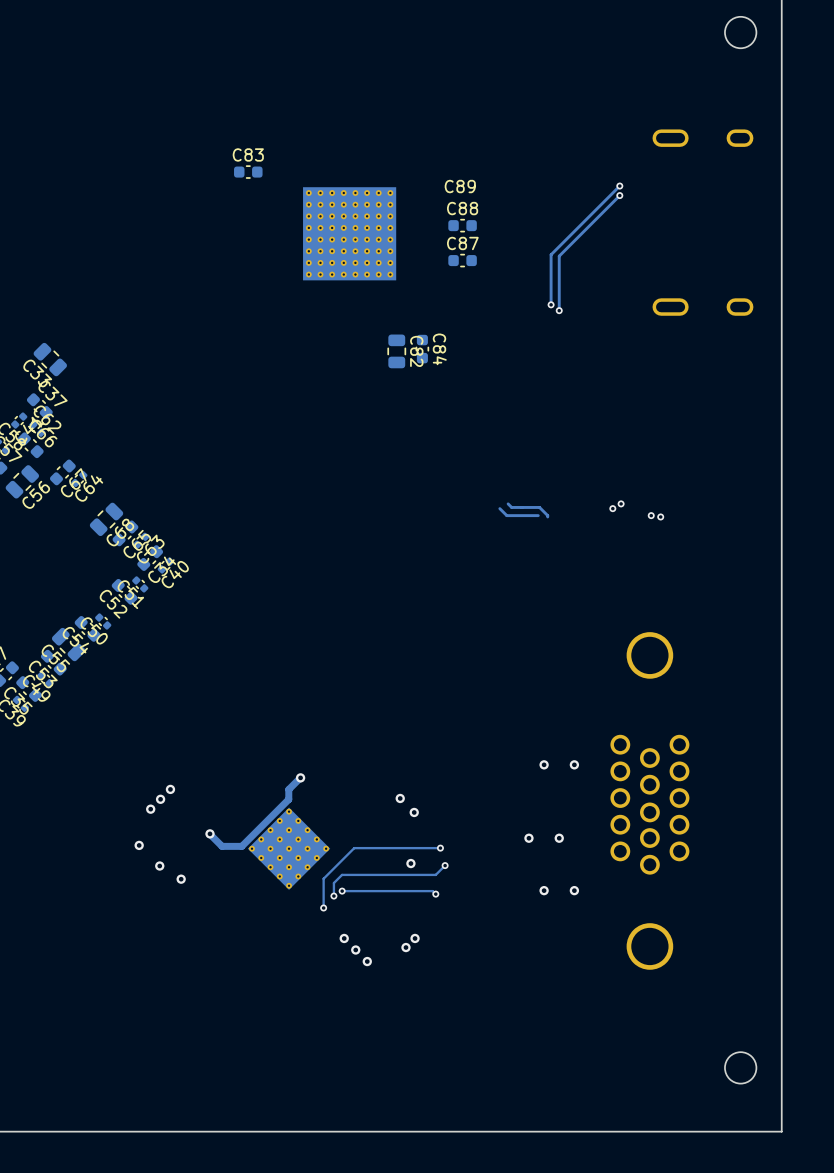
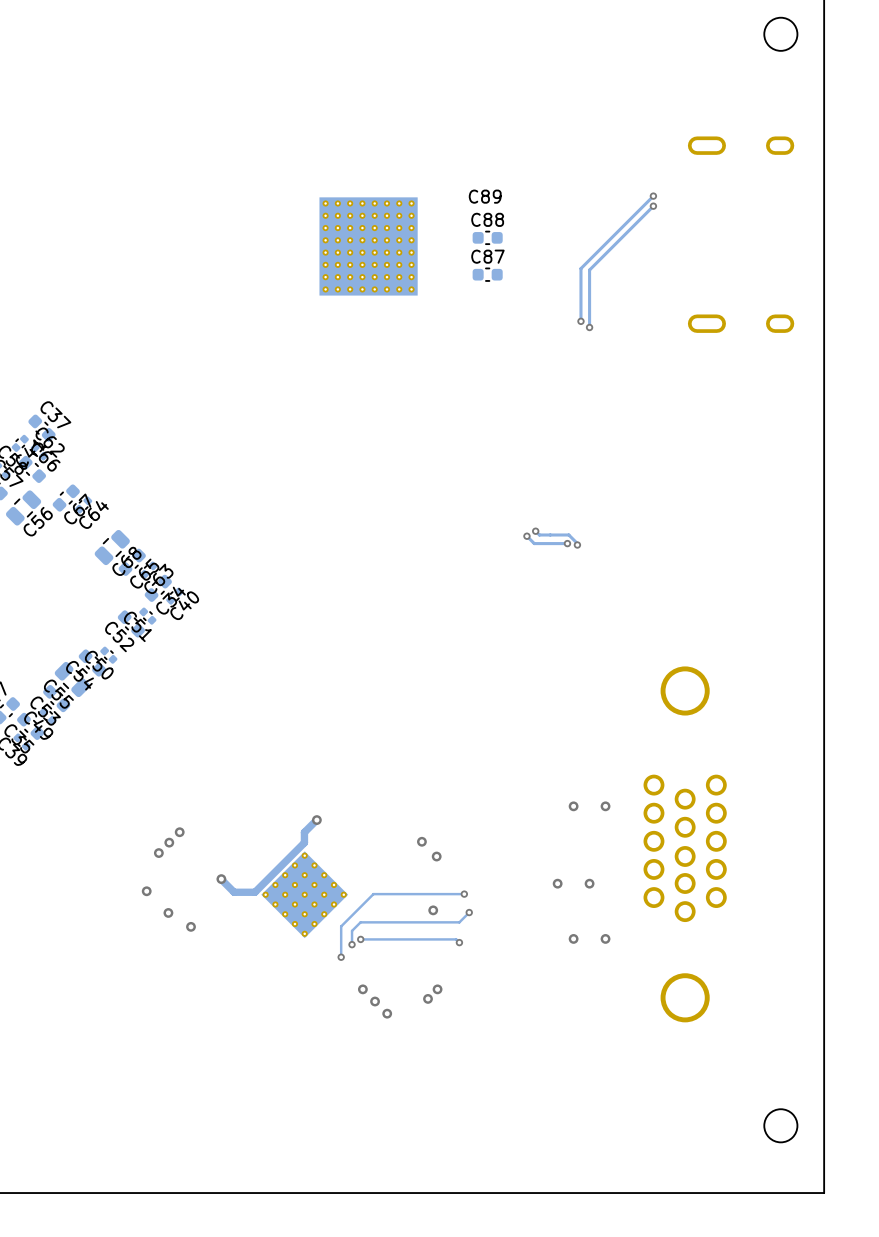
C83: (248, 172) -> none
C84: (422, 349) -> none
C82: (396, 351) -> none
C33: (50, 359) -> none
via: none -> (535, 531)
via: (621, 503) -> none
via: none -> (526, 536)
via: (612, 508) -> none
via: none -> (567, 543)
via: (651, 515) -> none
via: none -> (577, 545)
via: (660, 516) -> none

